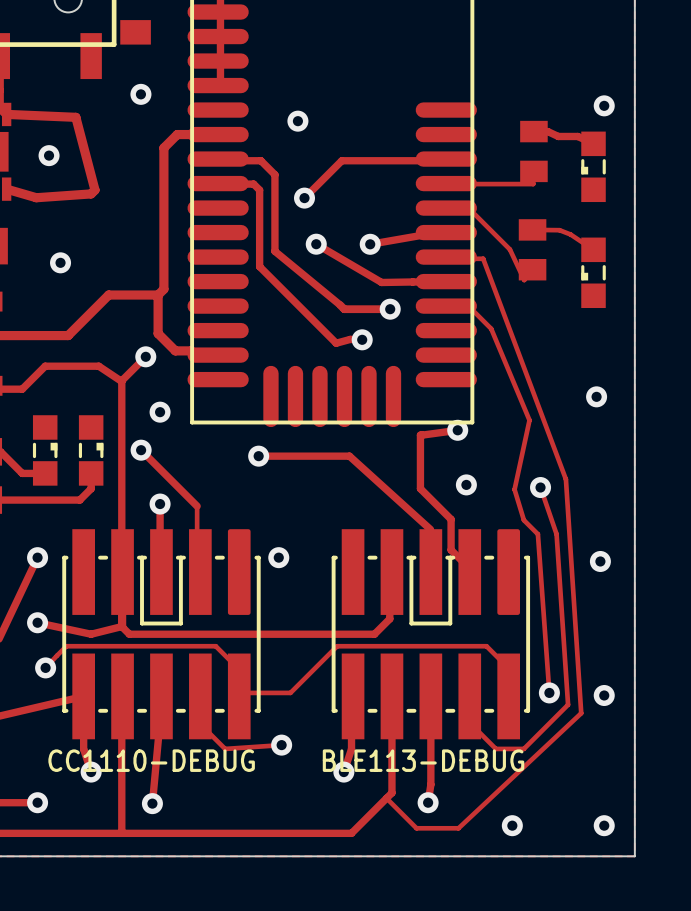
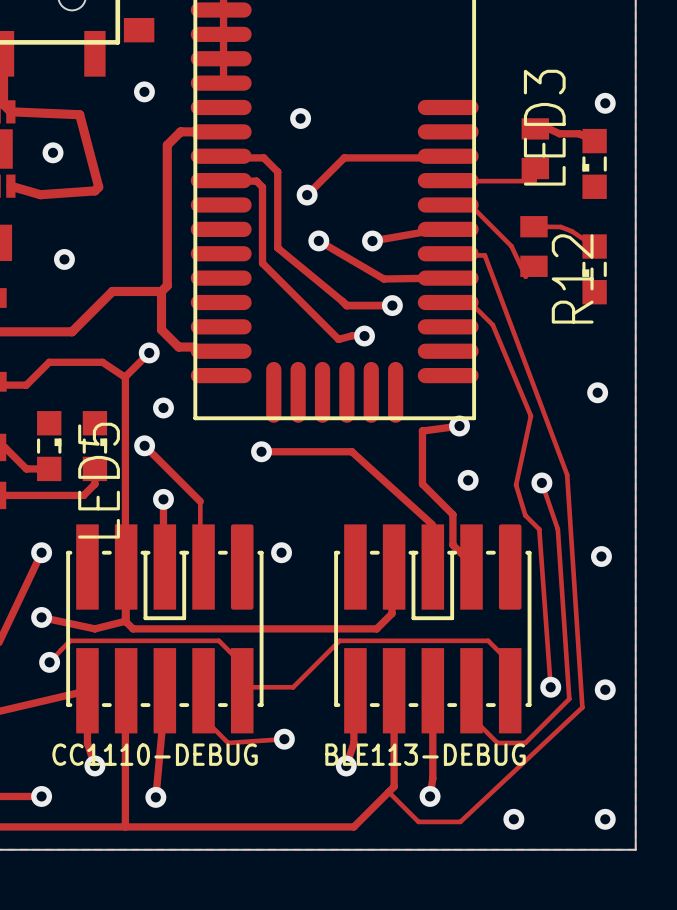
LED3 name: none -> LED3 (544, 127)
R12 name: none -> R12 (572, 278)
LED5 name: none -> LED5 (99, 480)

